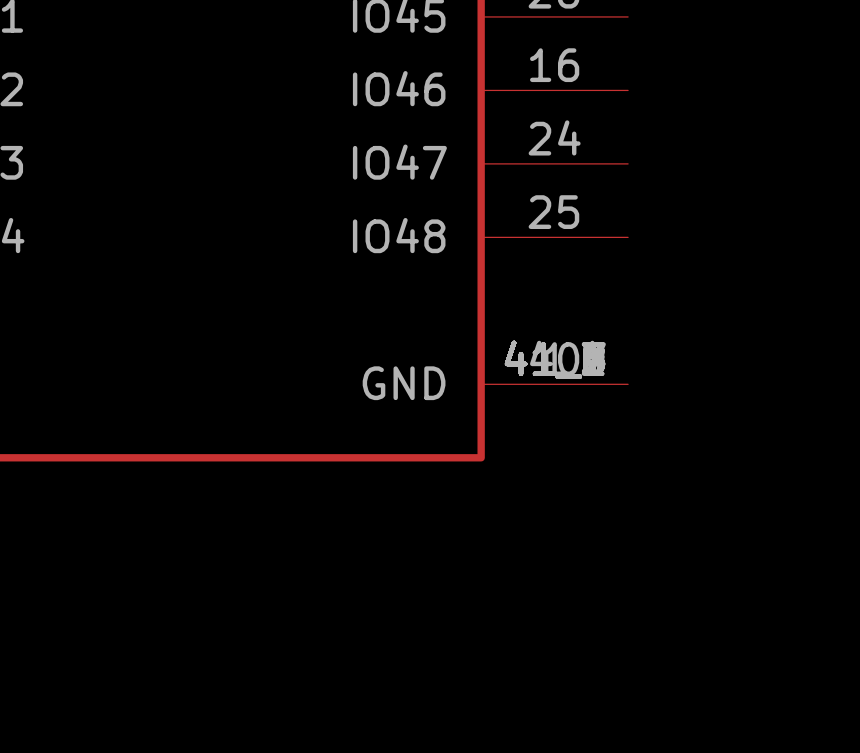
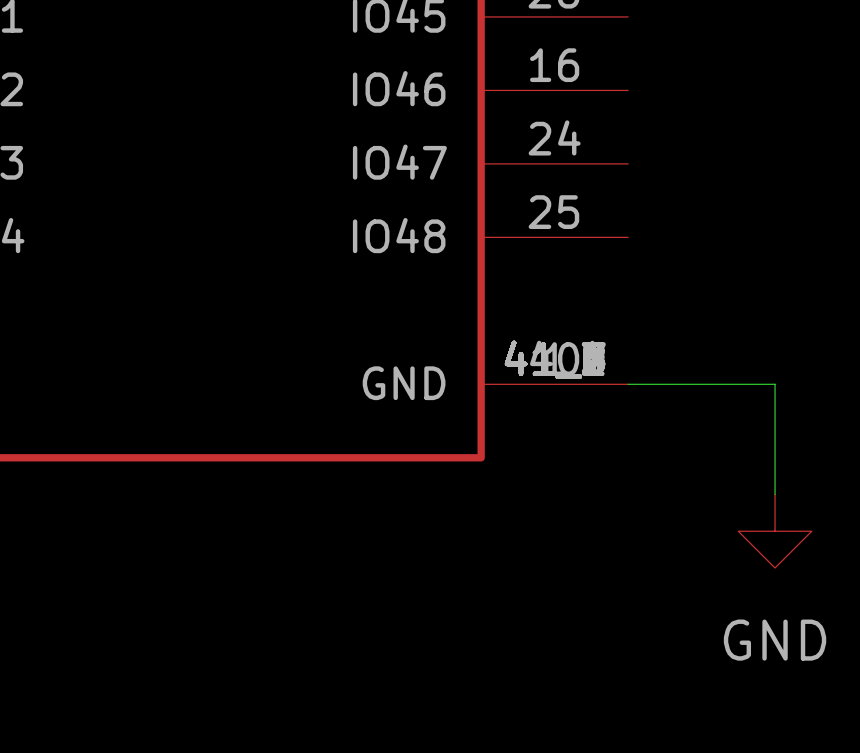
wire: none -> (628, 384) (775, 384) (775, 494)
power symbol: none -> GND (775, 531)

